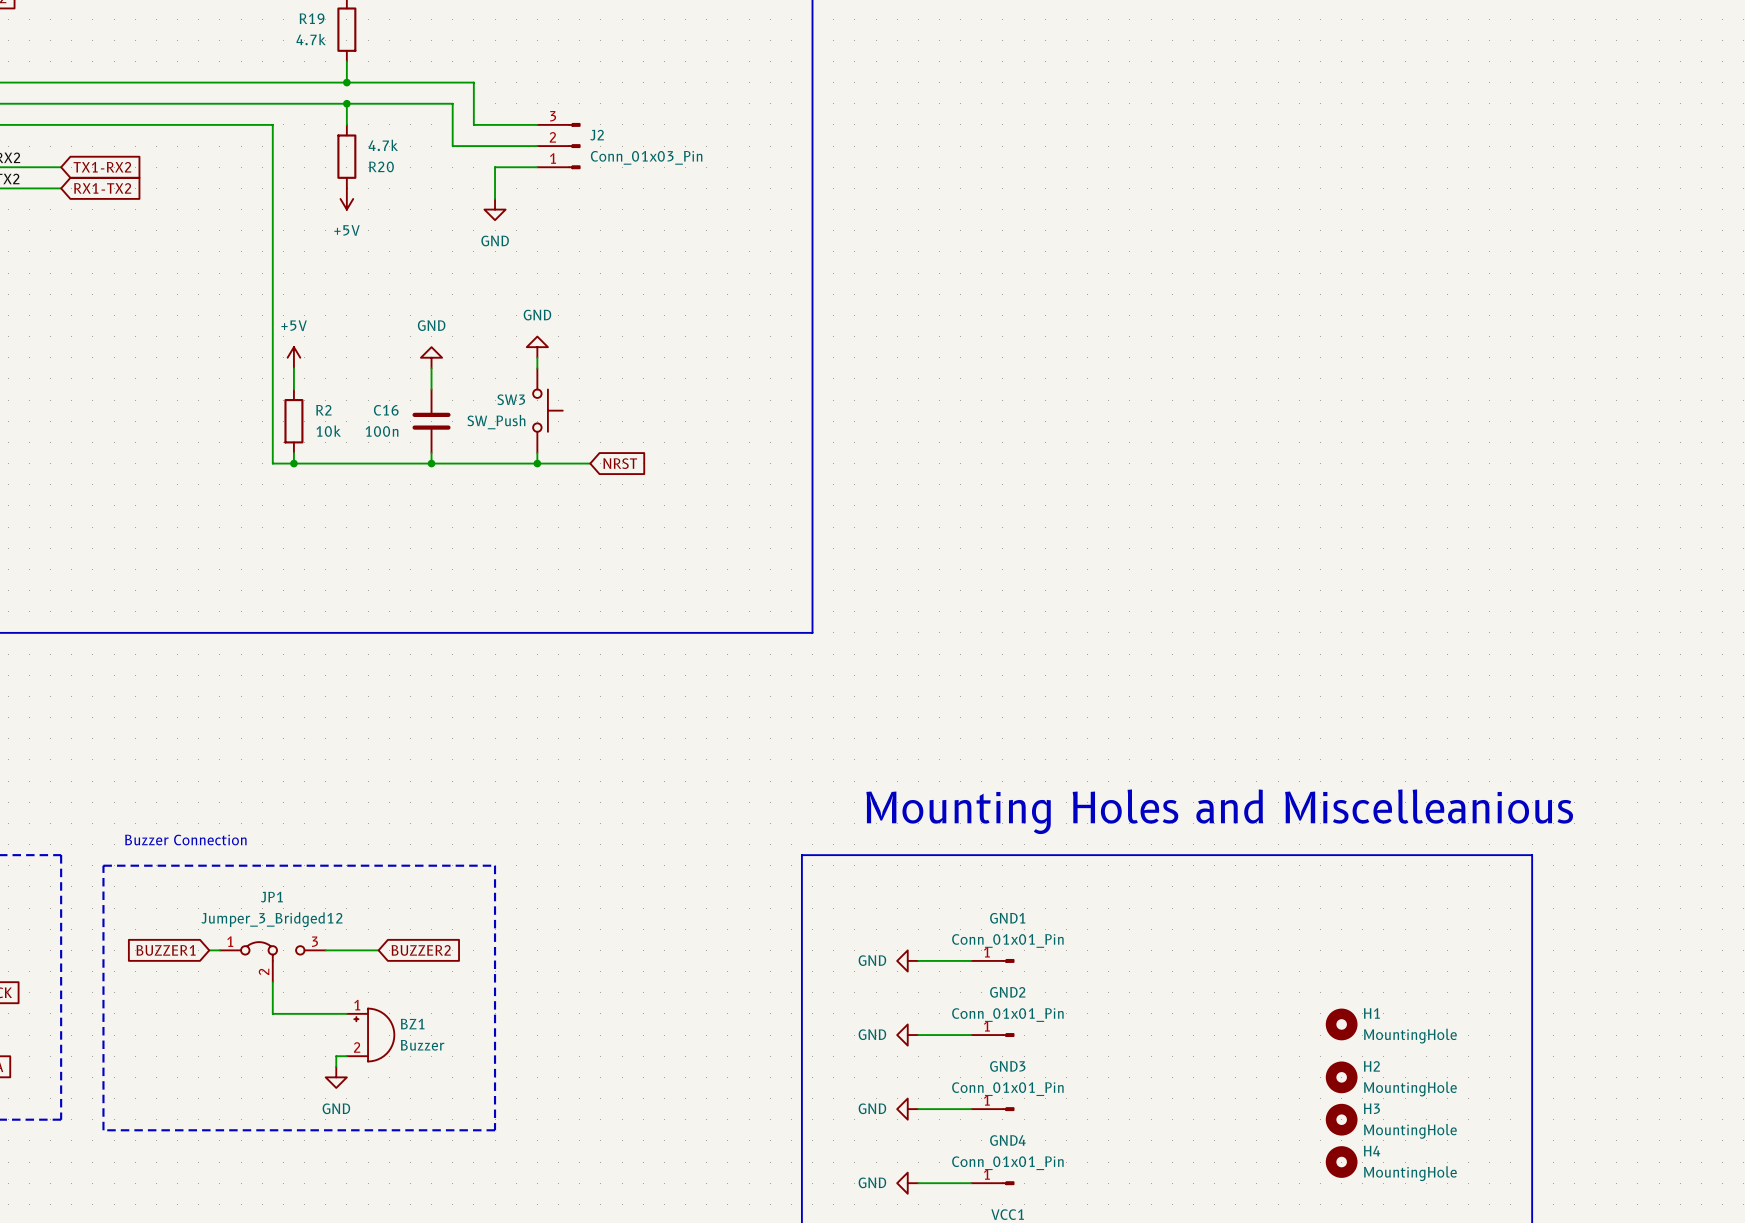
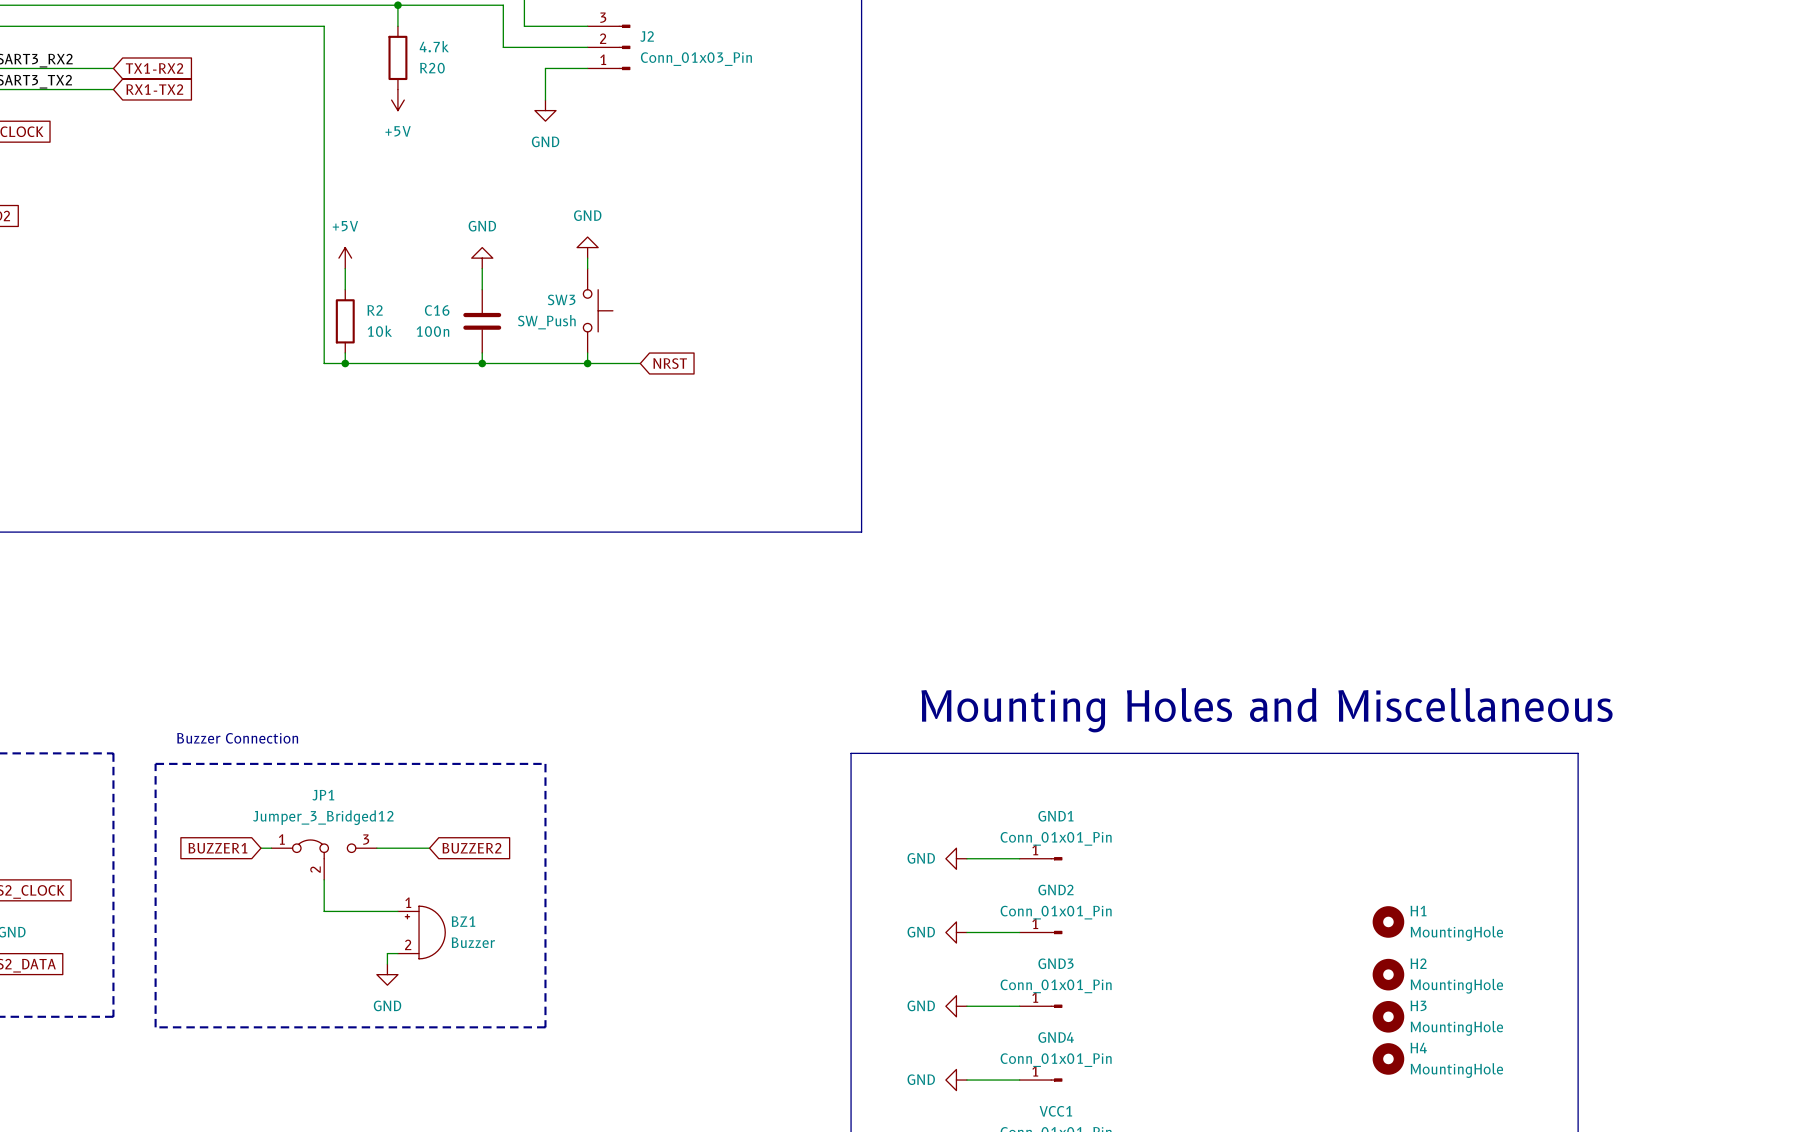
text: Mounting Holes and Miscelleanious (1219, 811) -> Mounting Holes and Miscellaneous (1267, 710)

